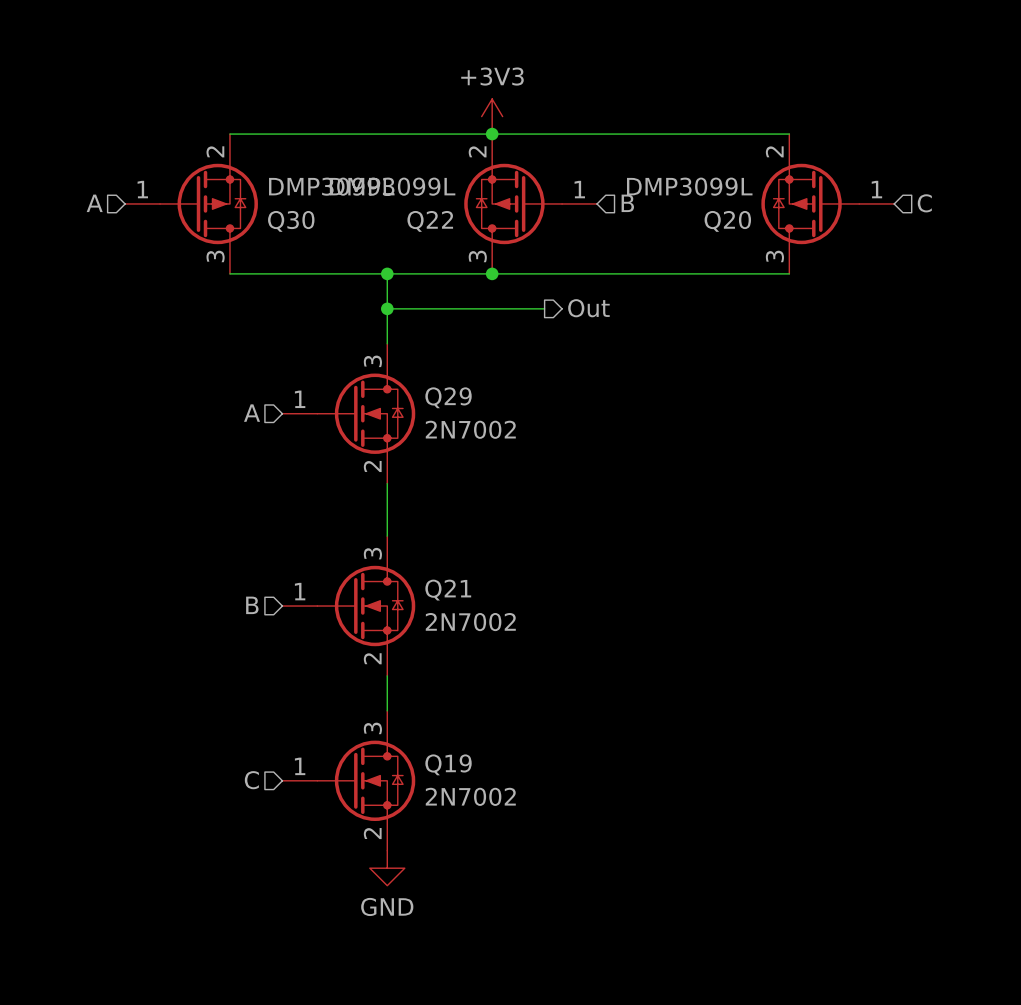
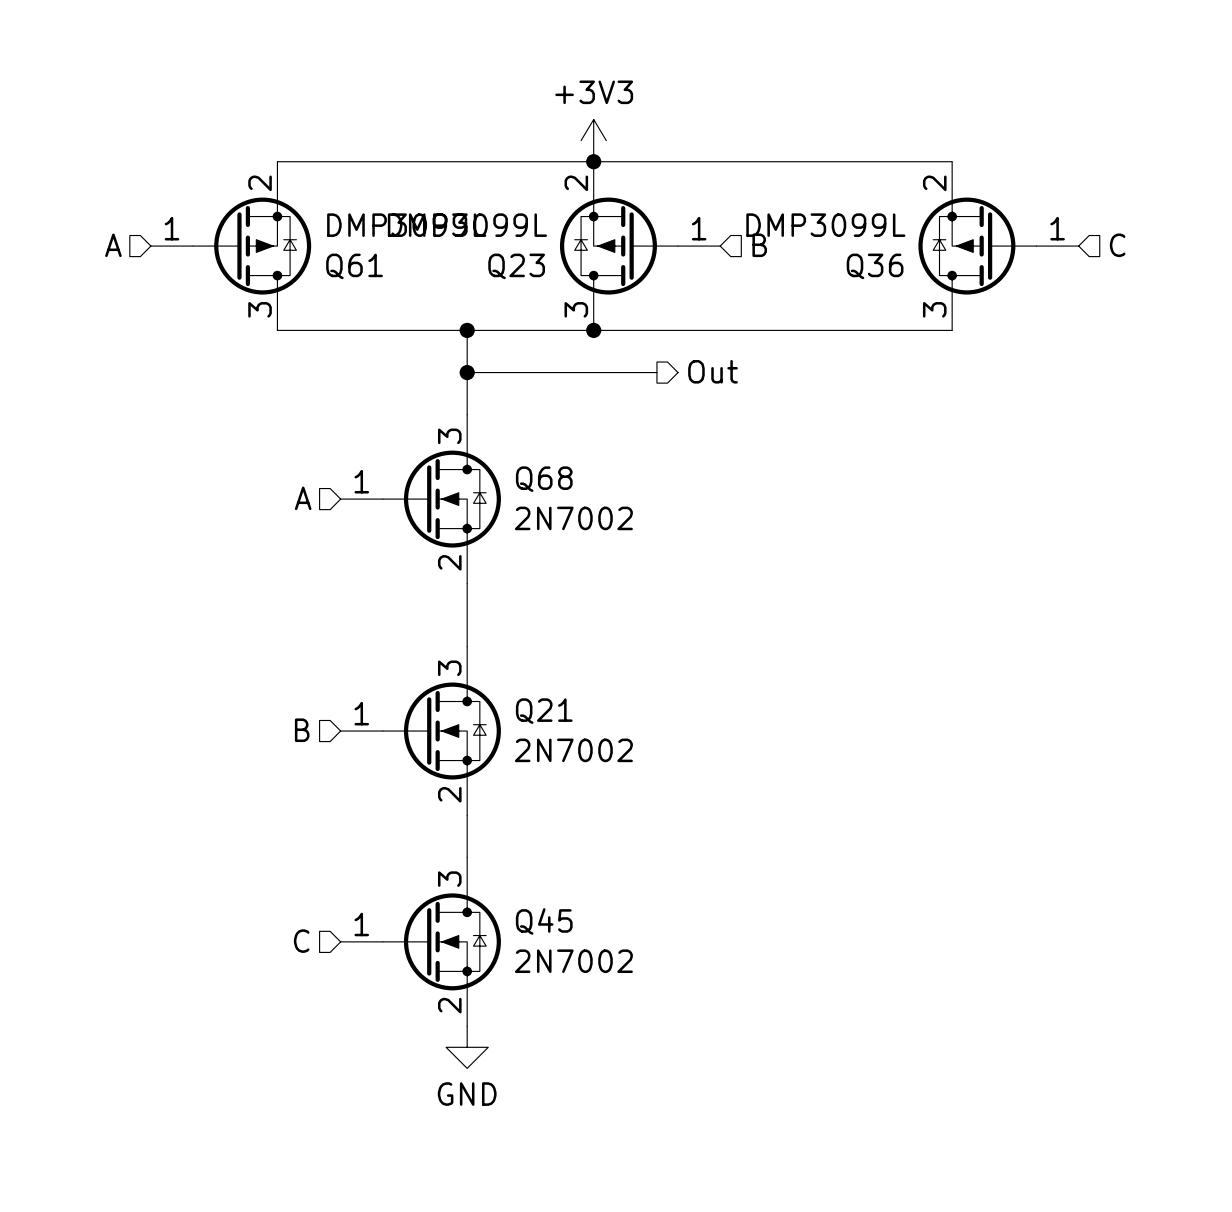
Q30 name: Q30 (291, 221) -> Q61 (354, 266)
Q22 name: Q22 (430, 221) -> Q23 (516, 266)
Q20 name: Q20 (727, 221) -> Q36 (875, 266)
Q29 name: Q29 (448, 397) -> Q68 (544, 479)
Q19 name: Q19 (448, 764) -> Q45 (544, 921)

